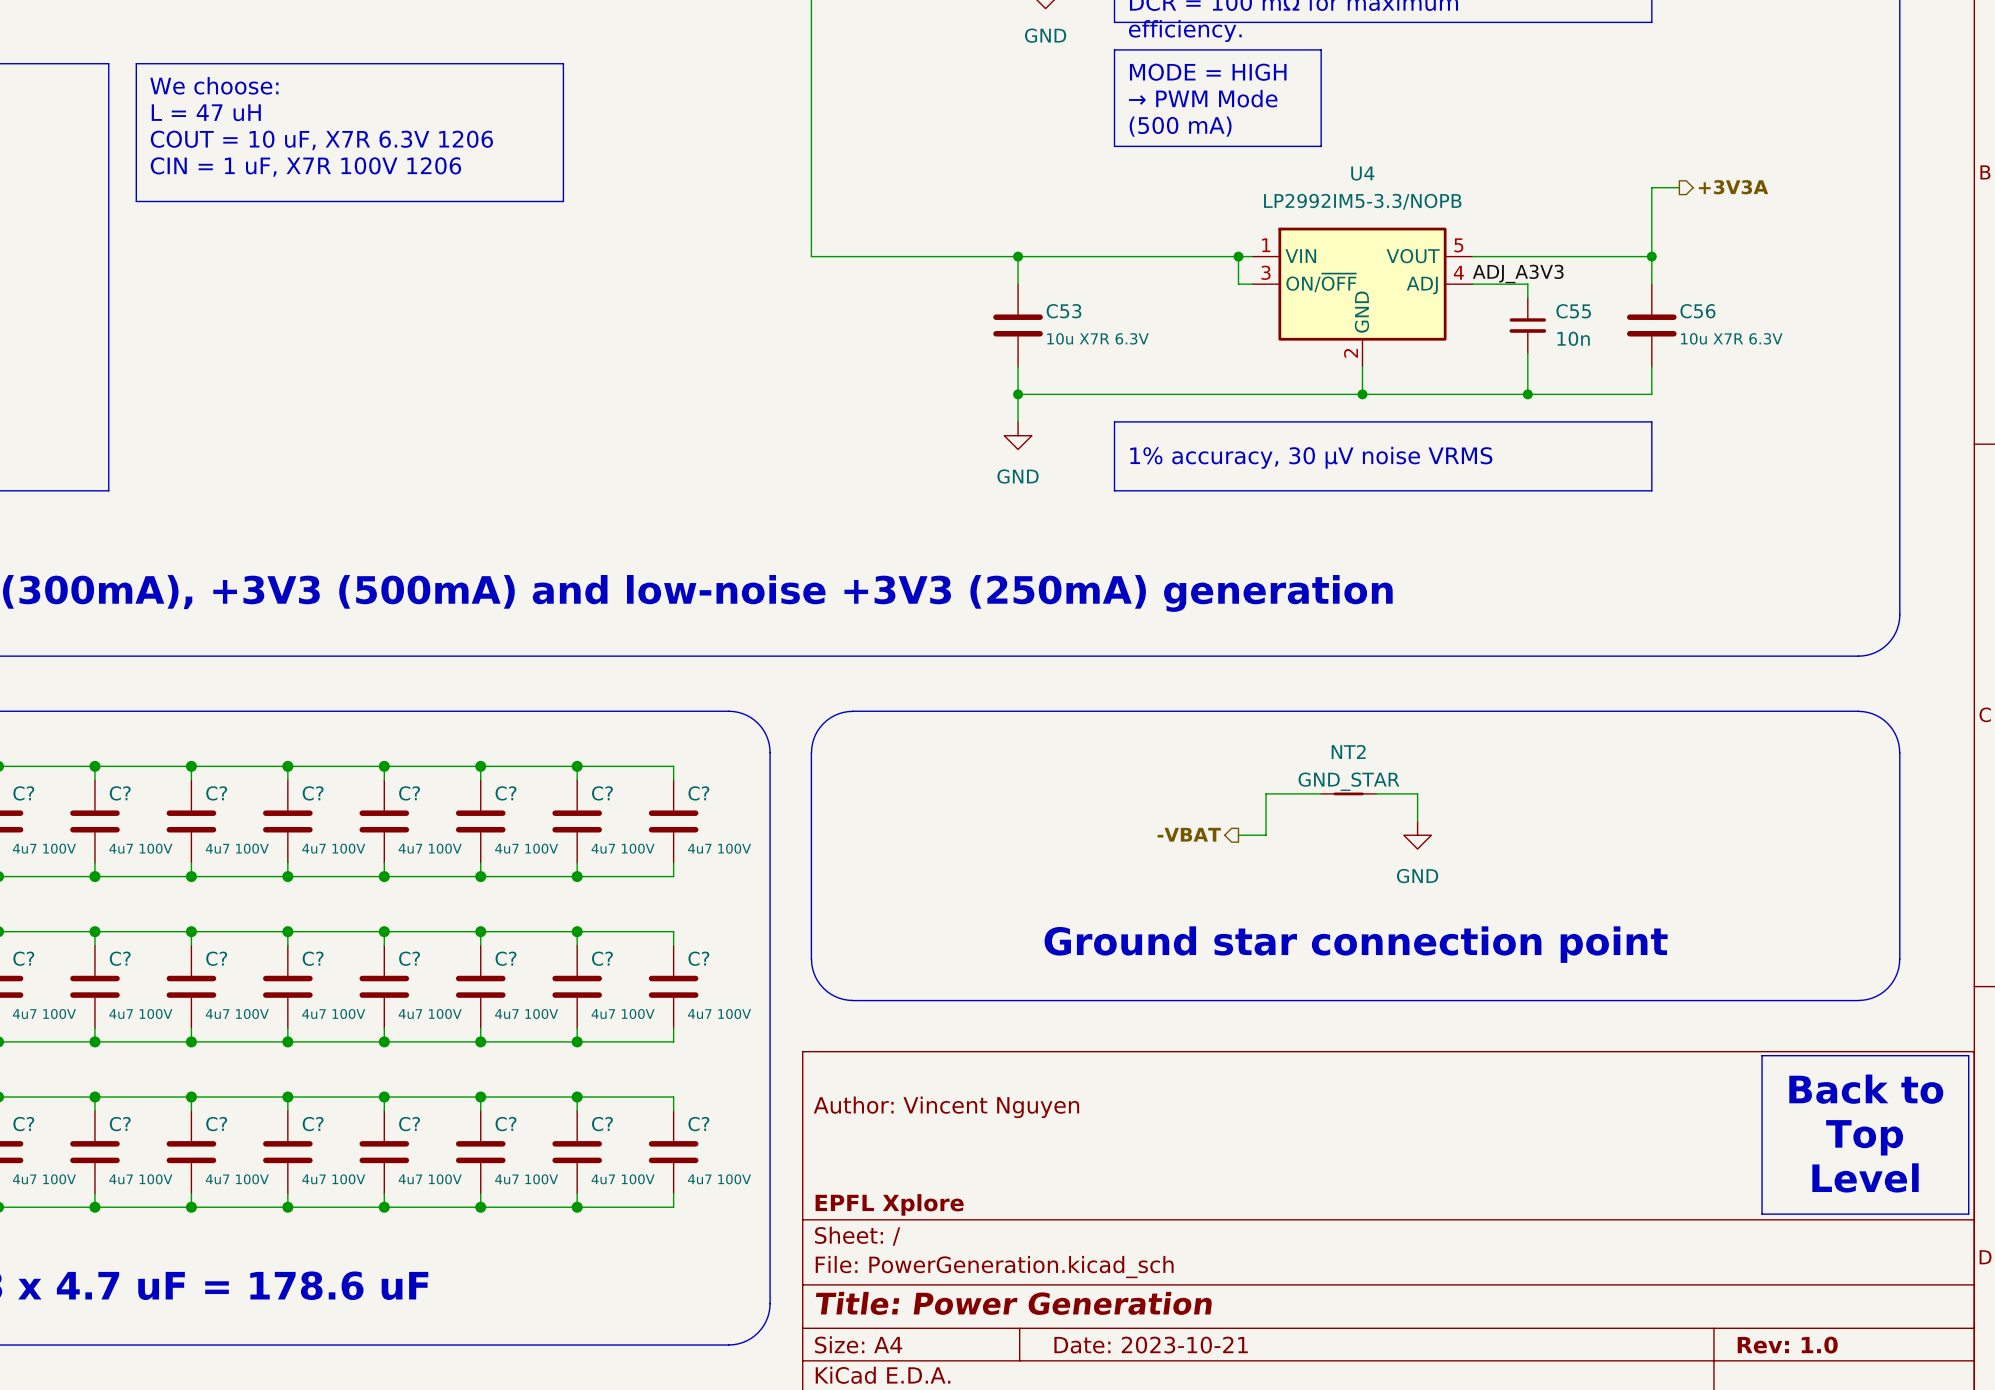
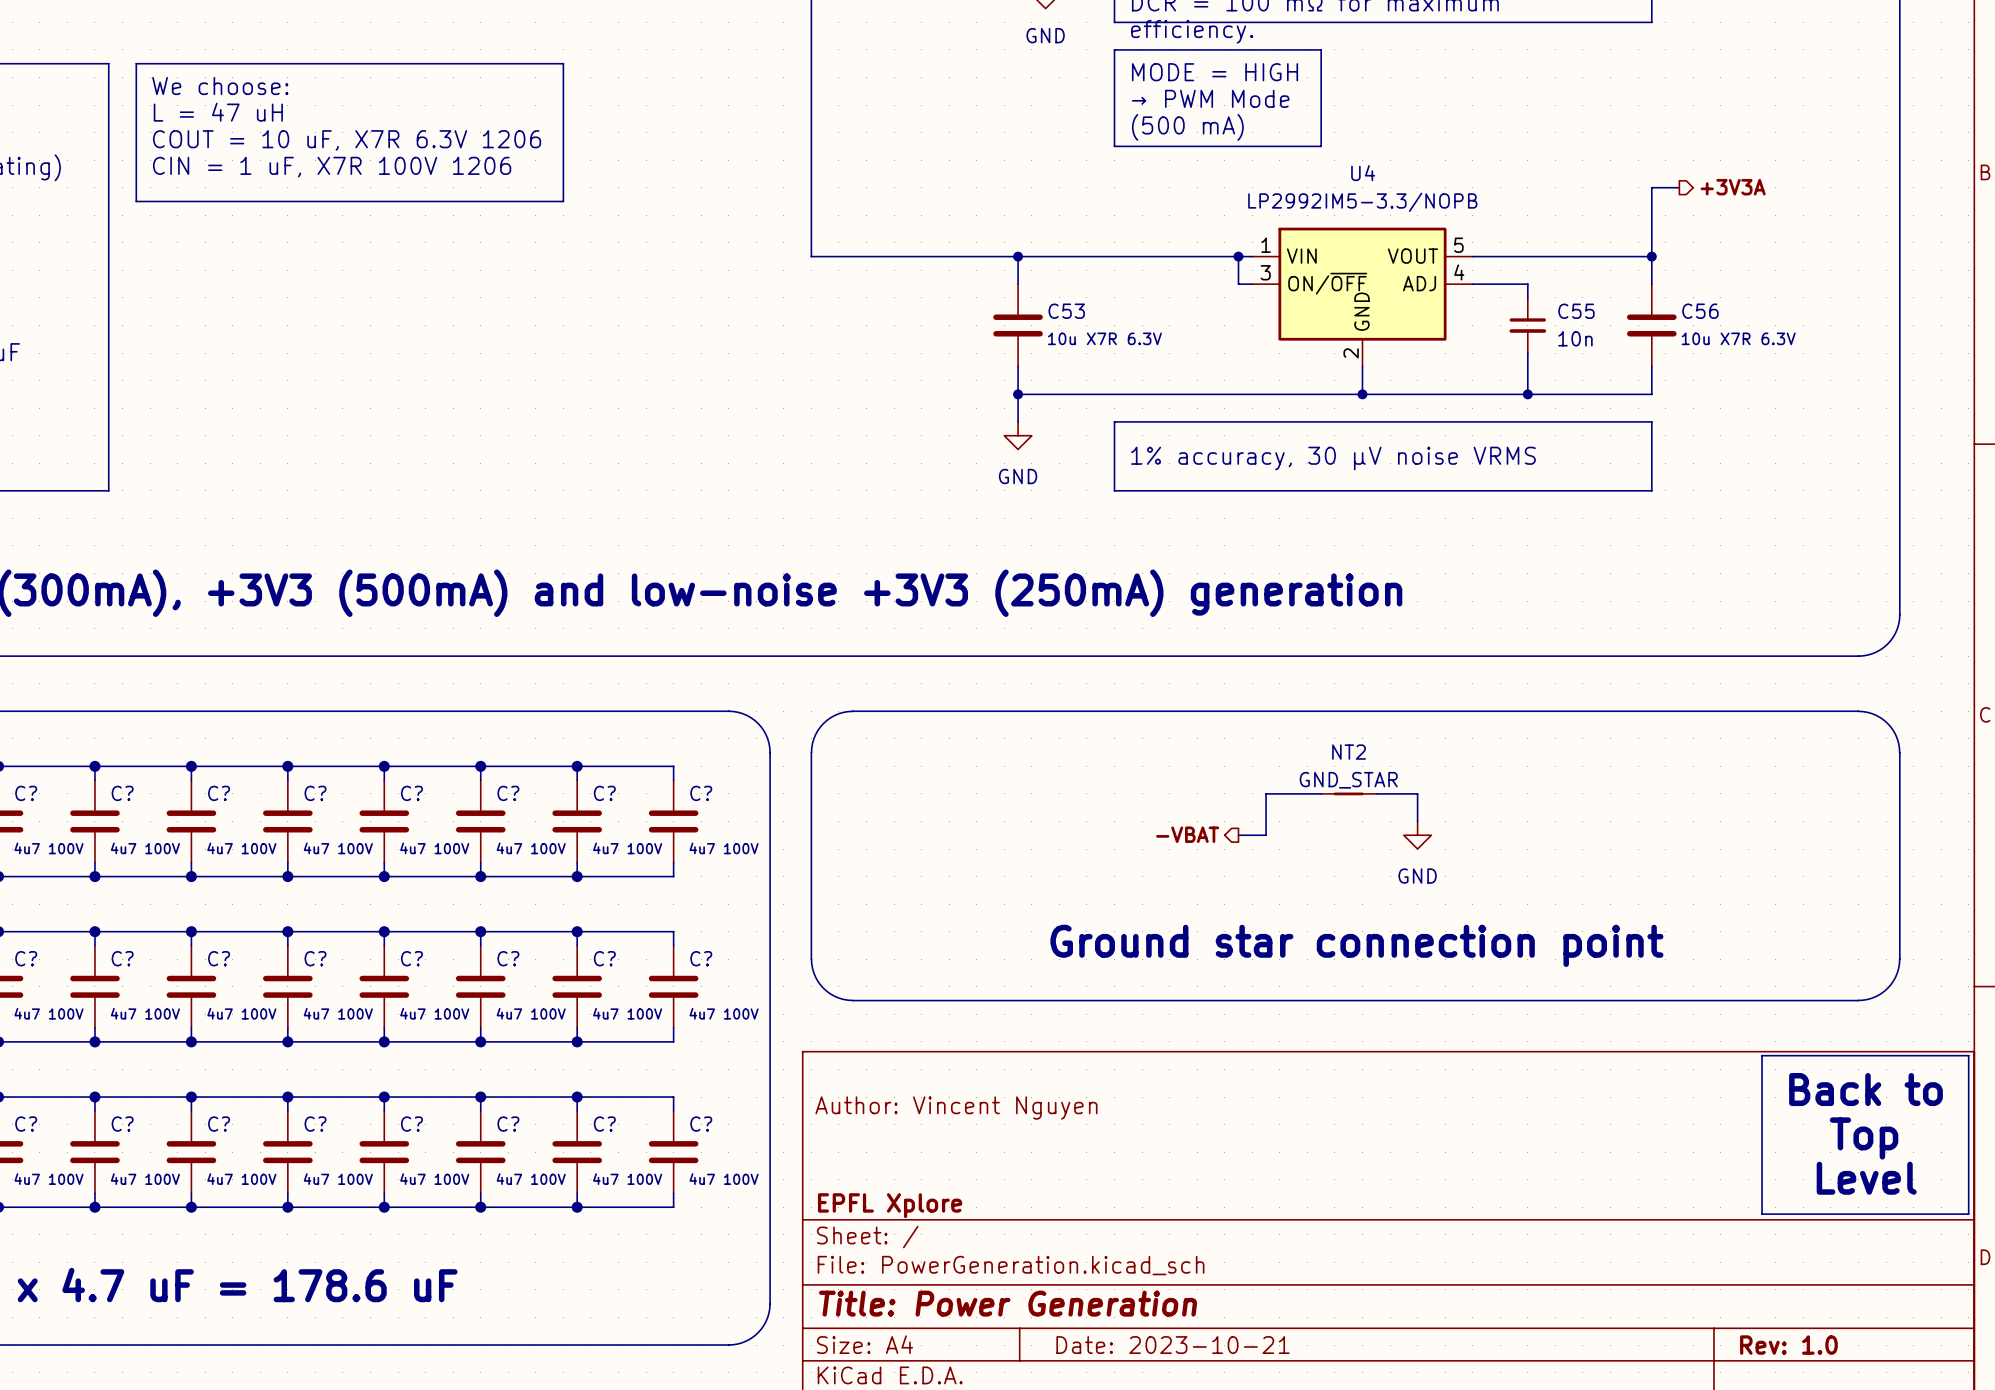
label: ADJ_A3V3 (1518, 273) -> none

